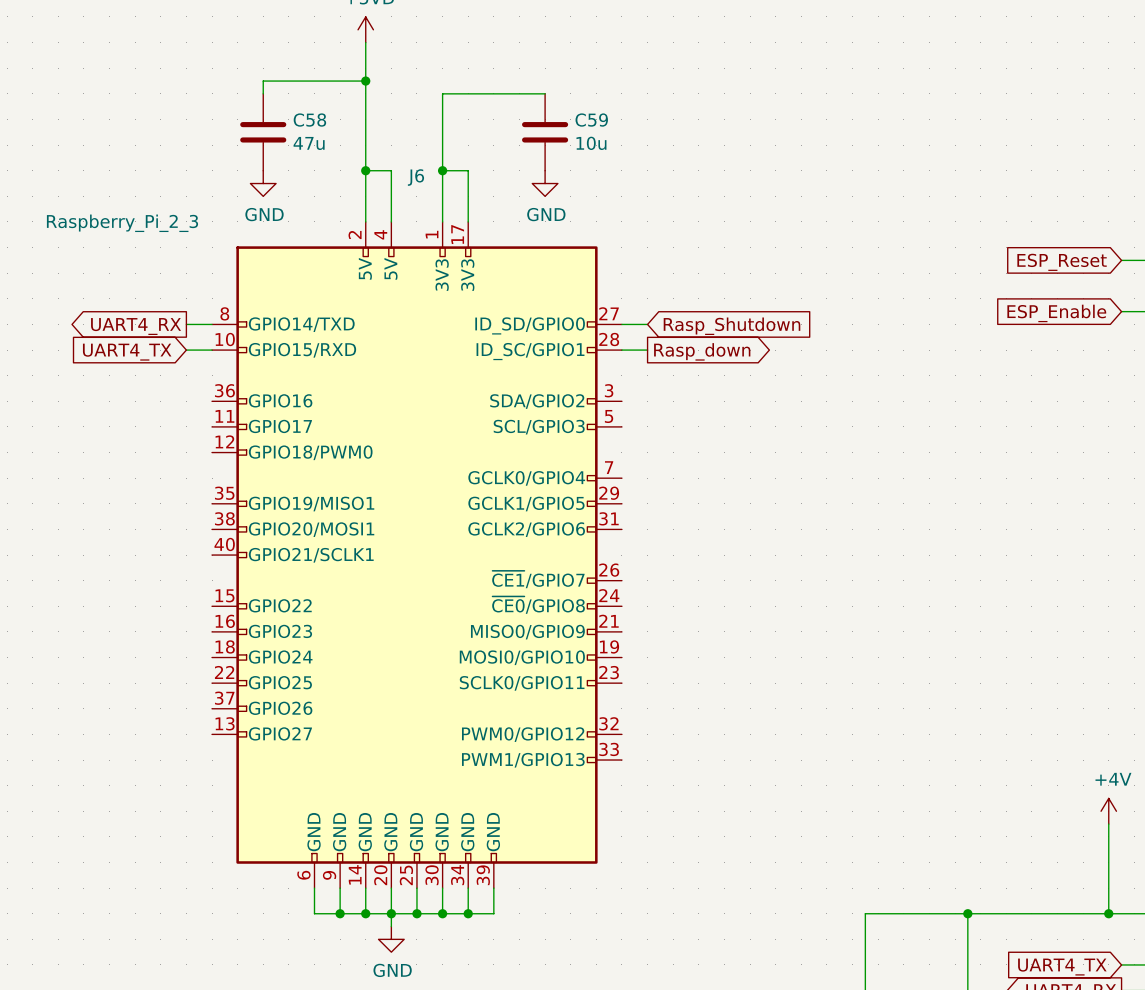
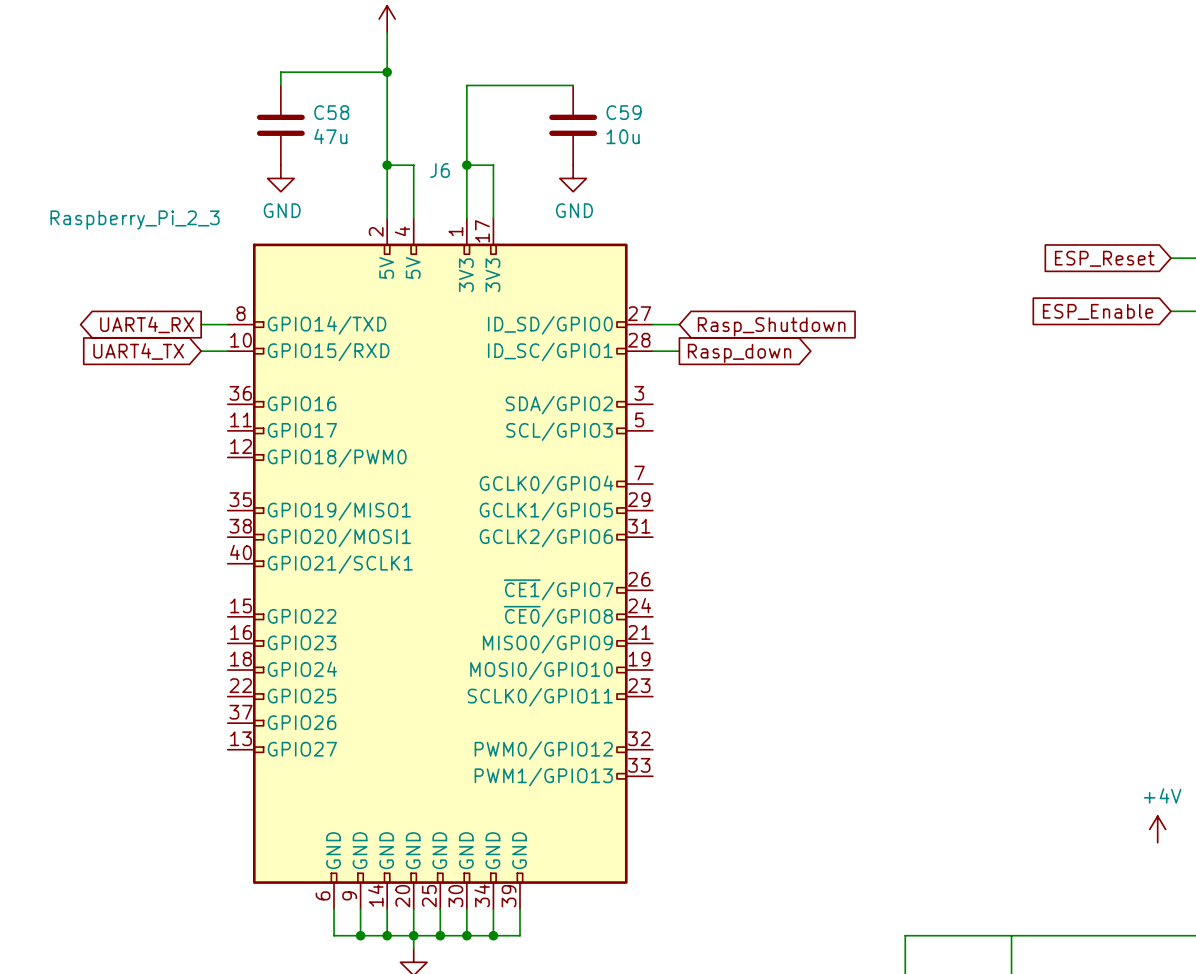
wire: (1108, 824) (1108, 913) -> none
junction: (967, 913) -> none
junction: (1108, 913) -> none

